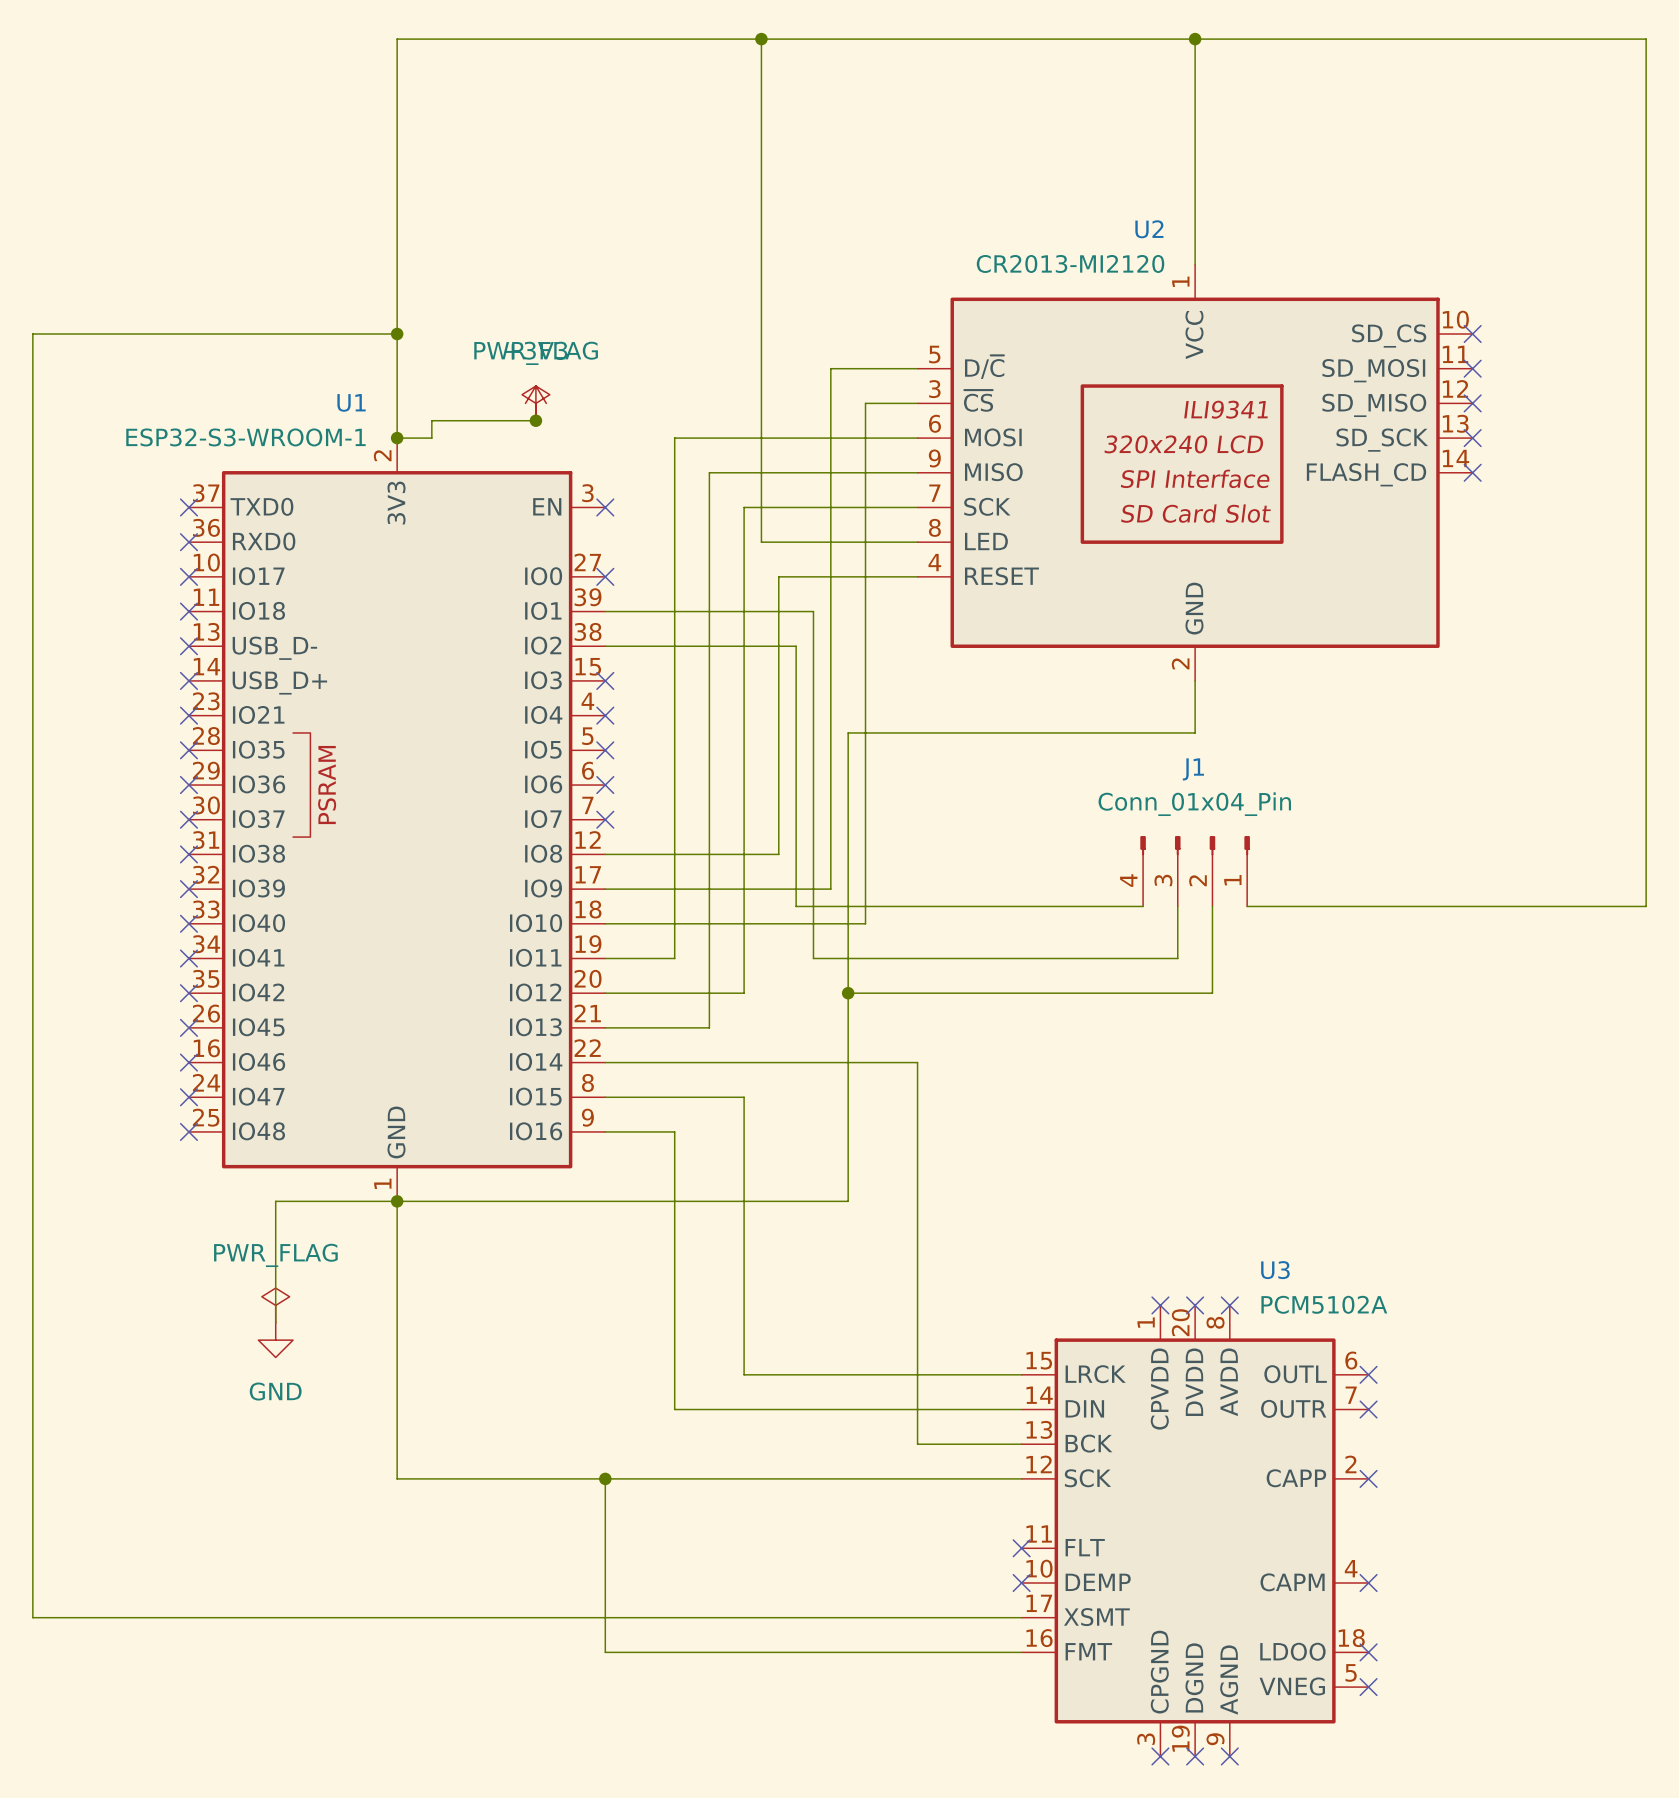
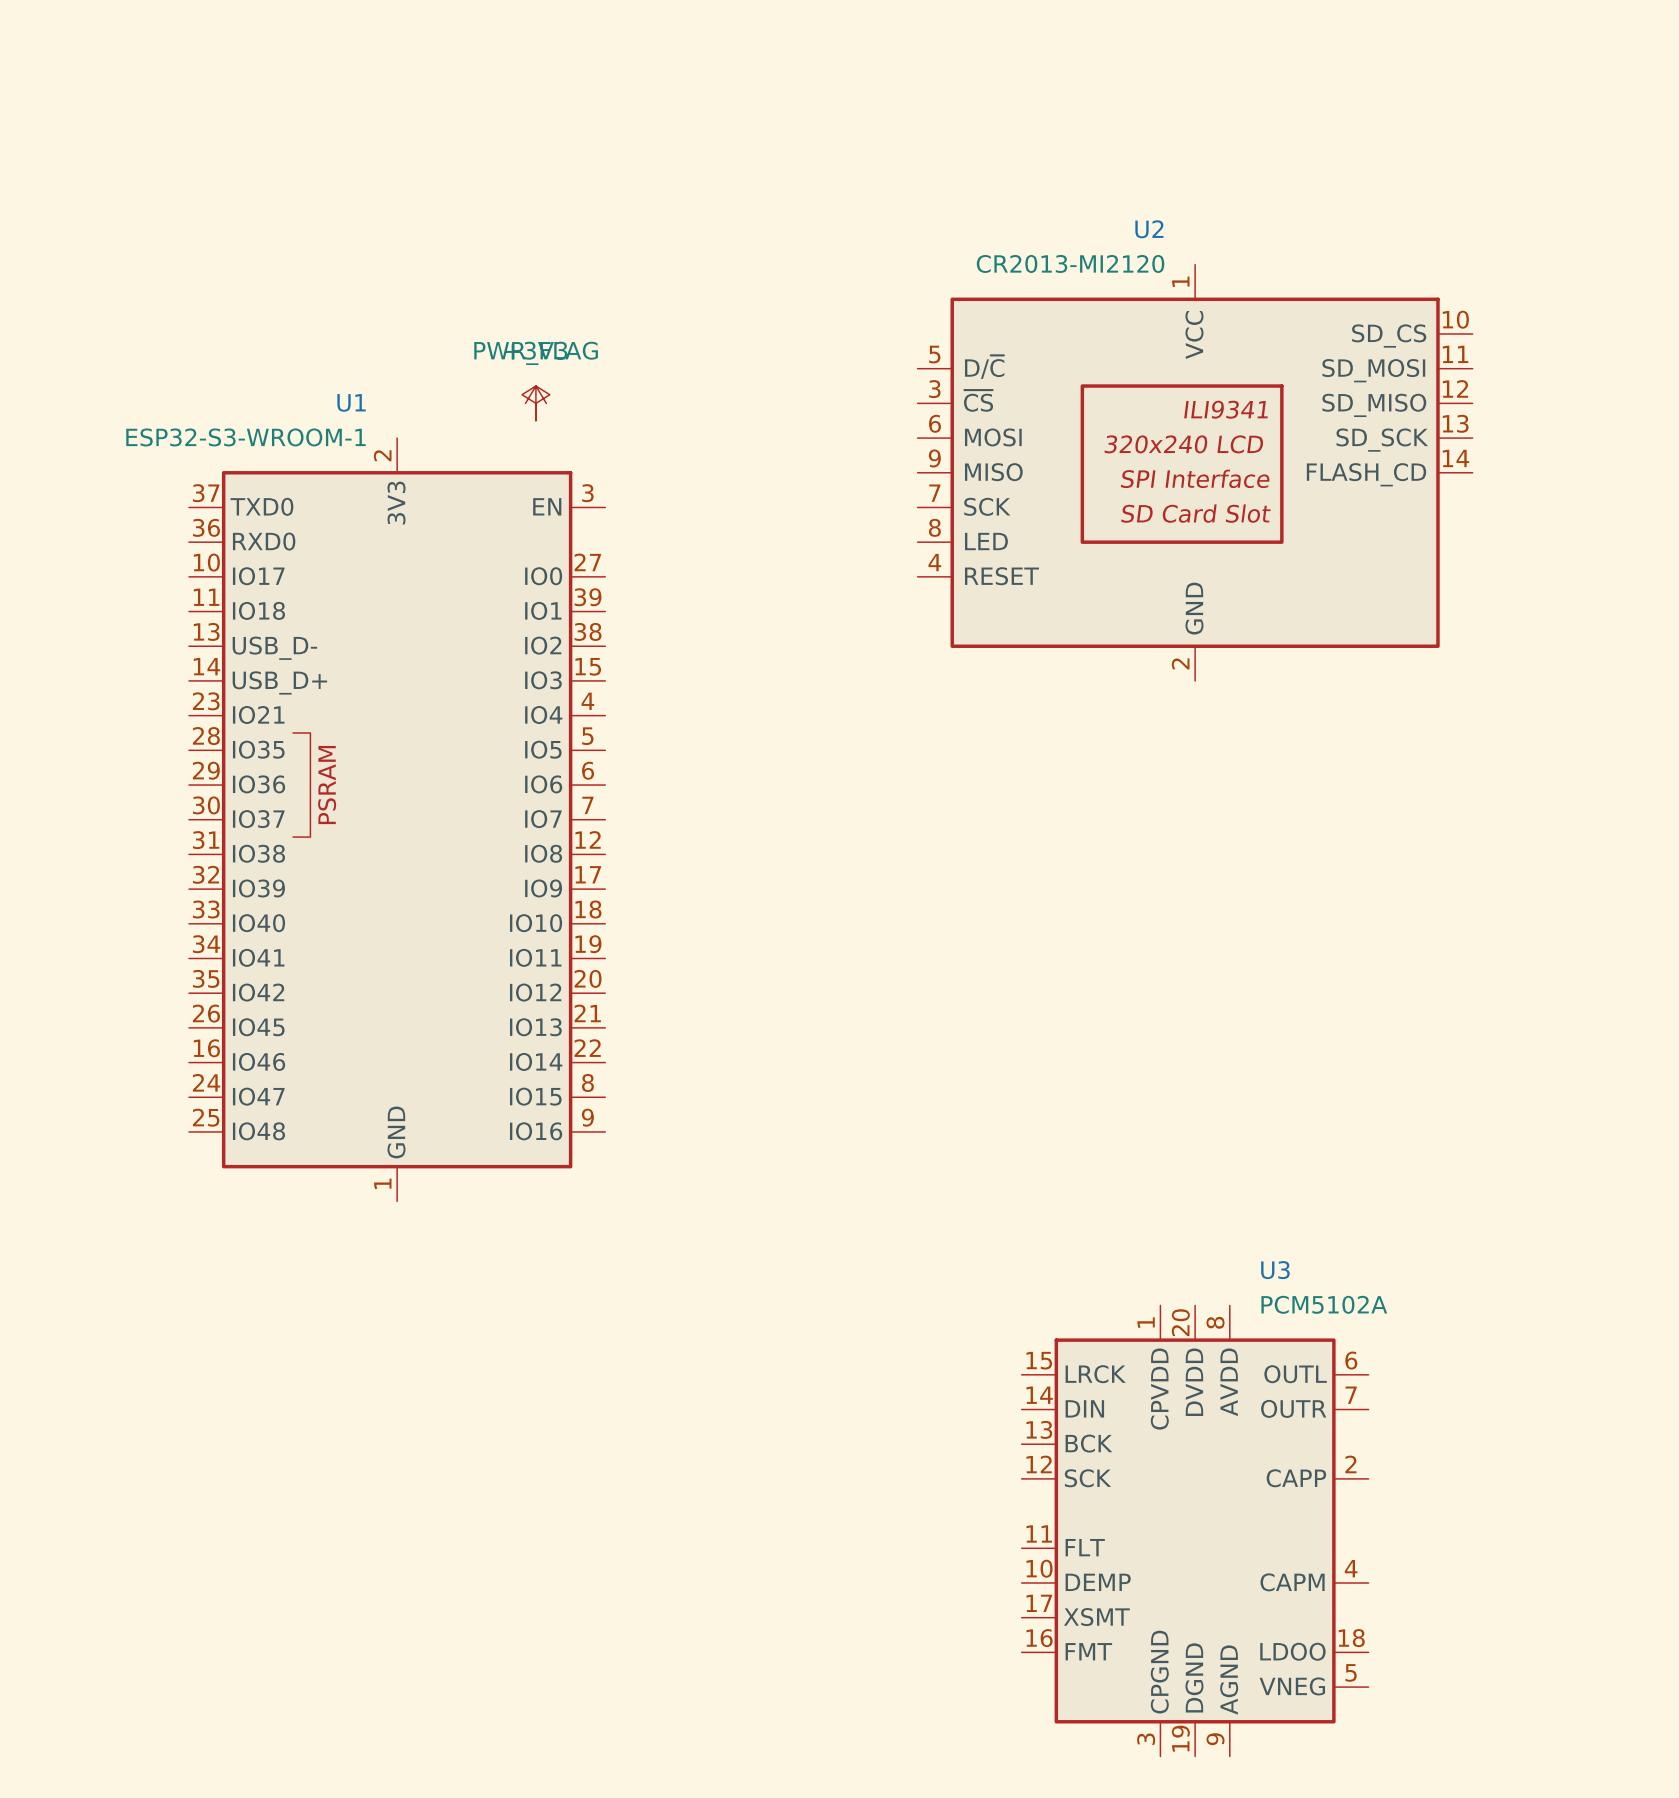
wire: (761, 39) (761, 542) (917, 542) -> none
junction: (761, 39) -> none
wire: (1195, 39) (1195, 264) -> none
junction: (1195, 39) -> none
wire: (397, 334) (32, 334) (32, 1617) (1021, 1617) -> none
junction: (397, 334) -> none
no-connect mark: (1472, 334) -> none
wire: (917, 368) (830, 368) (830, 889) (605, 889) -> none
no-connect mark: (1472, 368) -> none
wire: (917, 403) (865, 403) (865, 923) (605, 923) -> none
no-connect mark: (1472, 403) -> none
wire: (535, 420) (431, 420) (431, 438) (397, 438) (397, 39) (1646, 39) (1646, 906) (1247, 906) -> none
junction: (535, 420) -> none
junction: (397, 438) -> none
wire: (917, 438) (674, 438) (674, 958) (605, 958) -> none
no-connect mark: (1472, 438) -> none
wire: (917, 472) (709, 472) (709, 1027) (605, 1027) -> none
no-connect mark: (1472, 472) -> none
no-connect mark: (188, 507) -> none
no-connect mark: (605, 507) -> none
wire: (917, 507) (744, 507) (744, 993) (605, 993) -> none
no-connect mark: (188, 542) -> none
no-connect mark: (188, 576) -> none
no-connect mark: (605, 576) -> none
wire: (917, 576) (778, 576) (778, 854) (605, 854) -> none
no-connect mark: (188, 611) -> none
wire: (605, 611) (813, 611) (813, 958) (1177, 958) (1177, 906) -> none
no-connect mark: (188, 646) -> none
wire: (605, 646) (796, 646) (796, 906) (1143, 906) -> none
no-connect mark: (188, 680) -> none
no-connect mark: (605, 680) -> none
wire: (1195, 680) (1195, 732) (848, 732) (848, 1201) (275, 1201) (275, 1322) -> none
no-connect mark: (188, 715) -> none
no-connect mark: (605, 715) -> none
no-connect mark: (188, 750) -> none
no-connect mark: (605, 750) -> none
no-connect mark: (188, 785) -> none
no-connect mark: (605, 785) -> none
no-connect mark: (188, 819) -> none
no-connect mark: (605, 819) -> none
no-connect mark: (188, 854) -> none
J1: Conn_01x04_Pin (1195, 871) -> none
no-connect mark: (188, 889) -> none
wire: (1212, 906) (1212, 993) (848, 993) -> none
no-connect mark: (188, 923) -> none
no-connect mark: (188, 958) -> none
no-connect mark: (188, 993) -> none
junction: (848, 993) -> none
no-connect mark: (188, 1027) -> none
no-connect mark: (188, 1062) -> none
wire: (605, 1062) (917, 1062) (917, 1444) (1021, 1444) -> none
no-connect mark: (188, 1097) -> none
wire: (605, 1097) (744, 1097) (744, 1374) (1021, 1374) -> none
no-connect mark: (188, 1131) -> none
wire: (605, 1131) (674, 1131) (674, 1409) (1021, 1409) -> none
wire: (397, 1201) (397, 1478) (1021, 1478) -> none
junction: (397, 1201) -> none
power symbol: PWR_FLAG (275, 1305) -> none
no-connect mark: (1160, 1305) -> none
no-connect mark: (1195, 1305) -> none
no-connect mark: (1229, 1305) -> none
power symbol: GND (275, 1340) -> none
no-connect mark: (1368, 1374) -> none
no-connect mark: (1368, 1409) -> none
wire: (605, 1478) (605, 1652) (1021, 1652) -> none
junction: (605, 1478) -> none
no-connect mark: (1368, 1478) -> none
no-connect mark: (1021, 1548) -> none
no-connect mark: (1021, 1582) -> none
no-connect mark: (1368, 1582) -> none
no-connect mark: (1368, 1652) -> none
no-connect mark: (1368, 1687) -> none
no-connect mark: (1160, 1756) -> none
no-connect mark: (1195, 1756) -> none
no-connect mark: (1229, 1756) -> none

